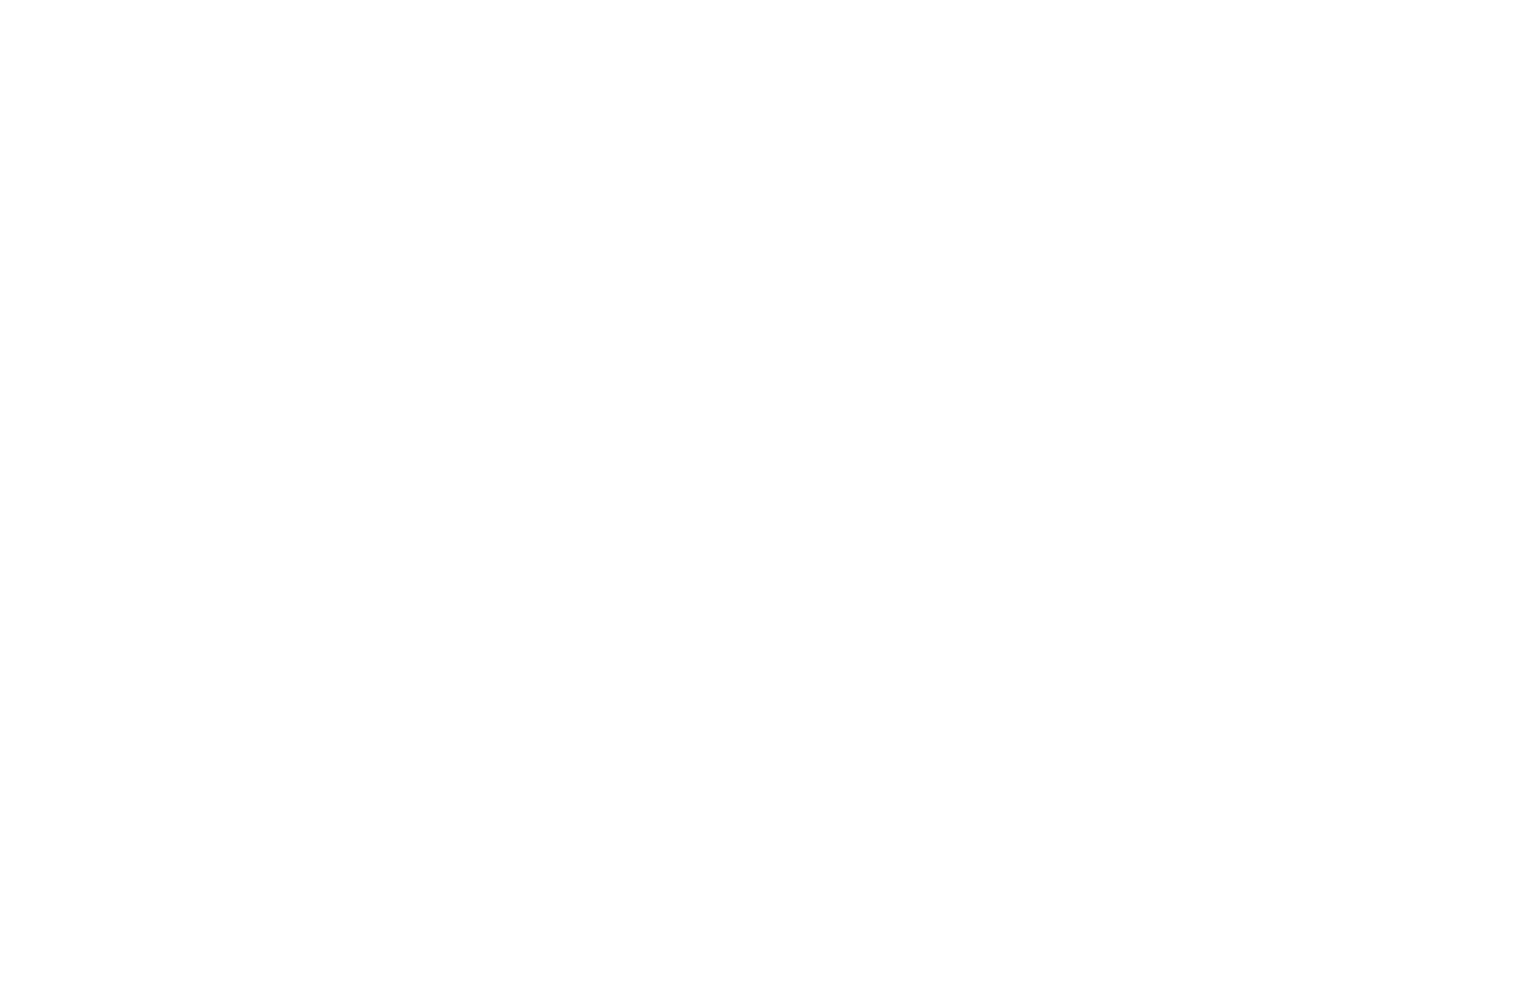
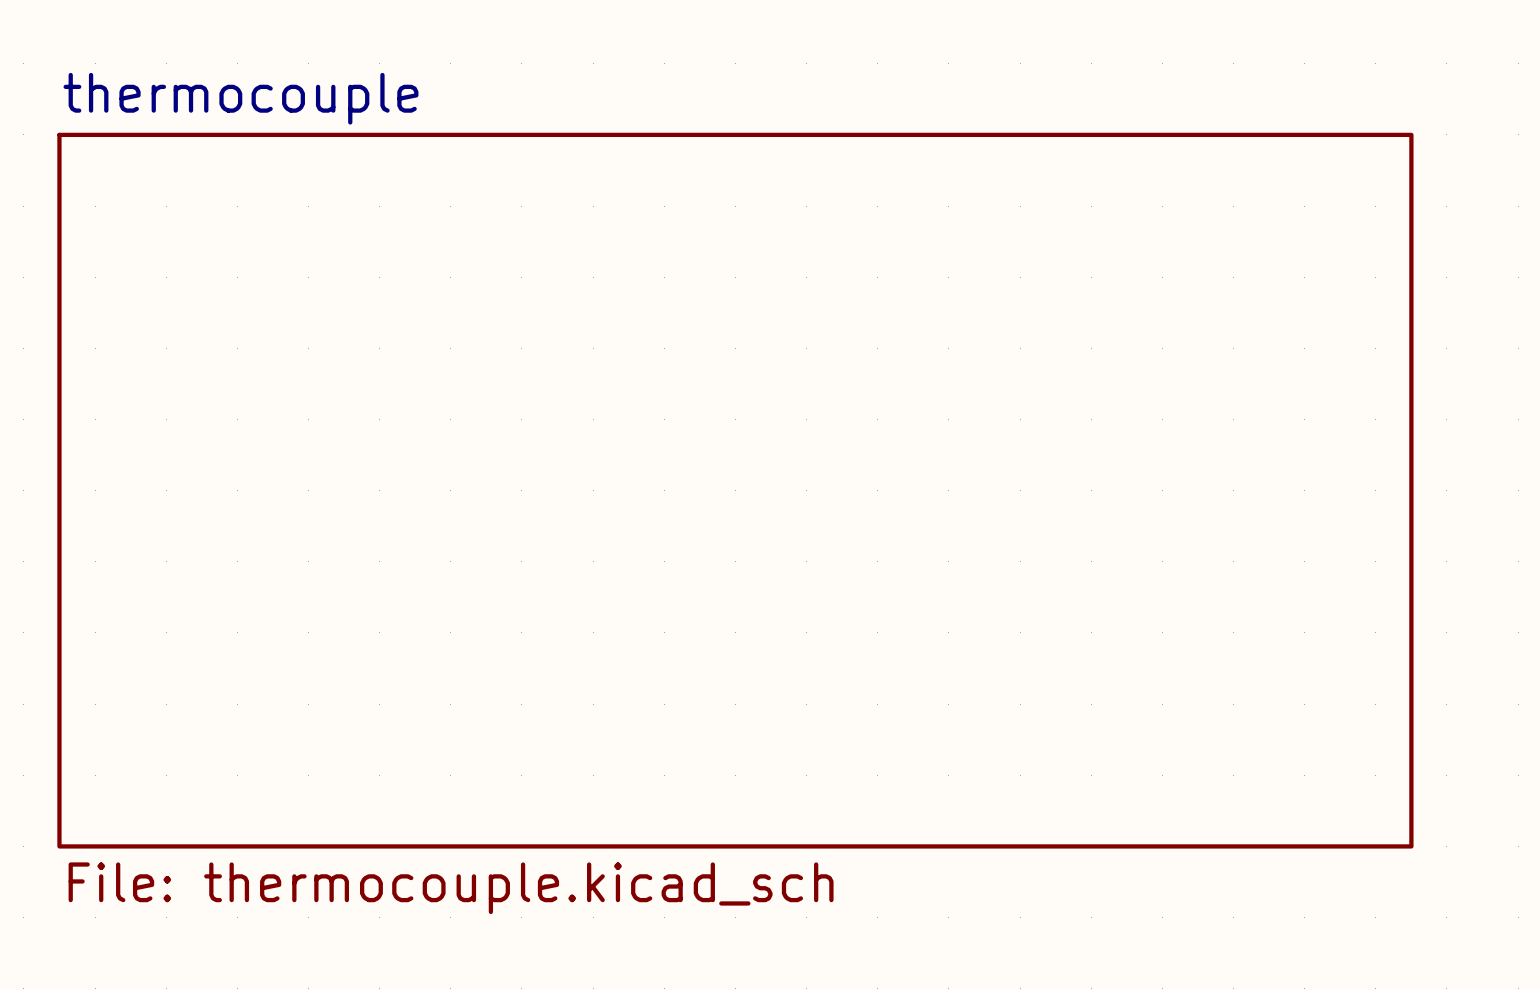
sheet thermocouple: none -> File: thermocouple.kicad_sch (735, 490)

